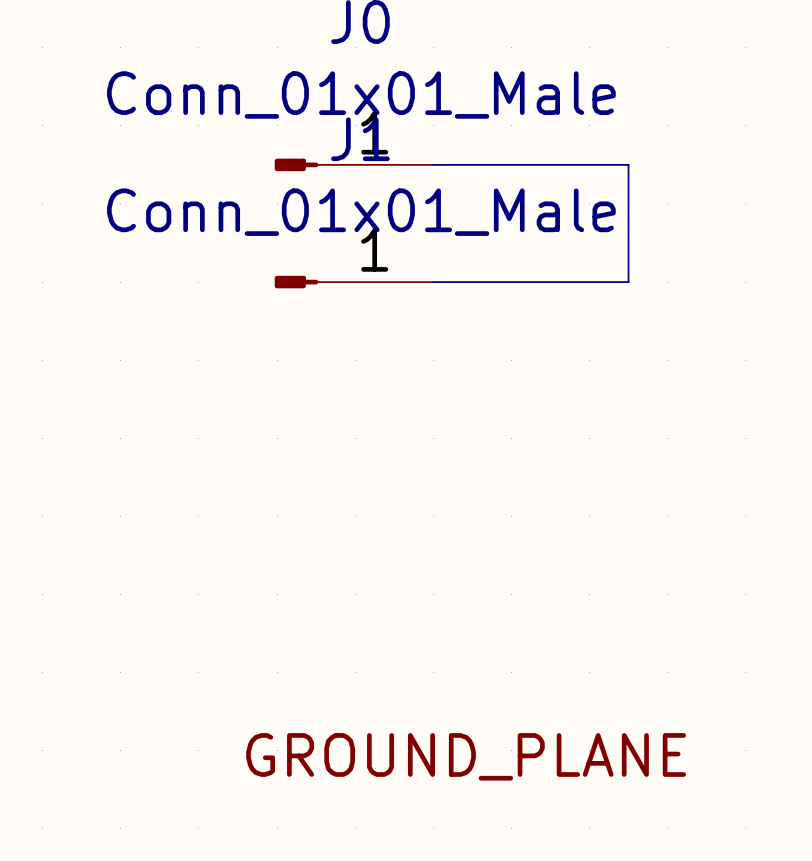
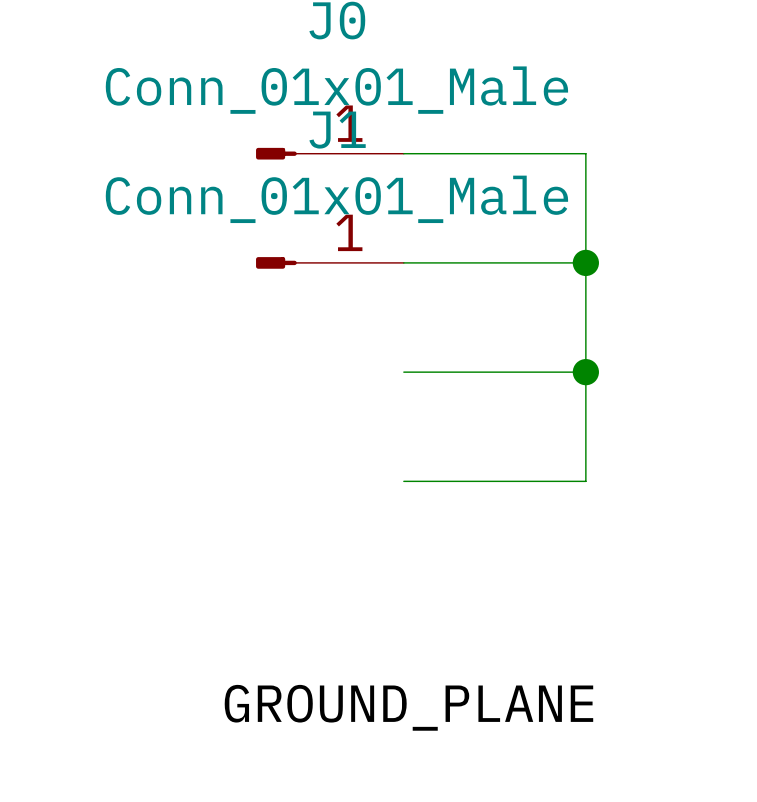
wire: none -> (585, 262) (585, 481) (403, 481)
junction: none -> (585, 262)
wire: none -> (403, 372) (585, 372)
junction: none -> (585, 372)

